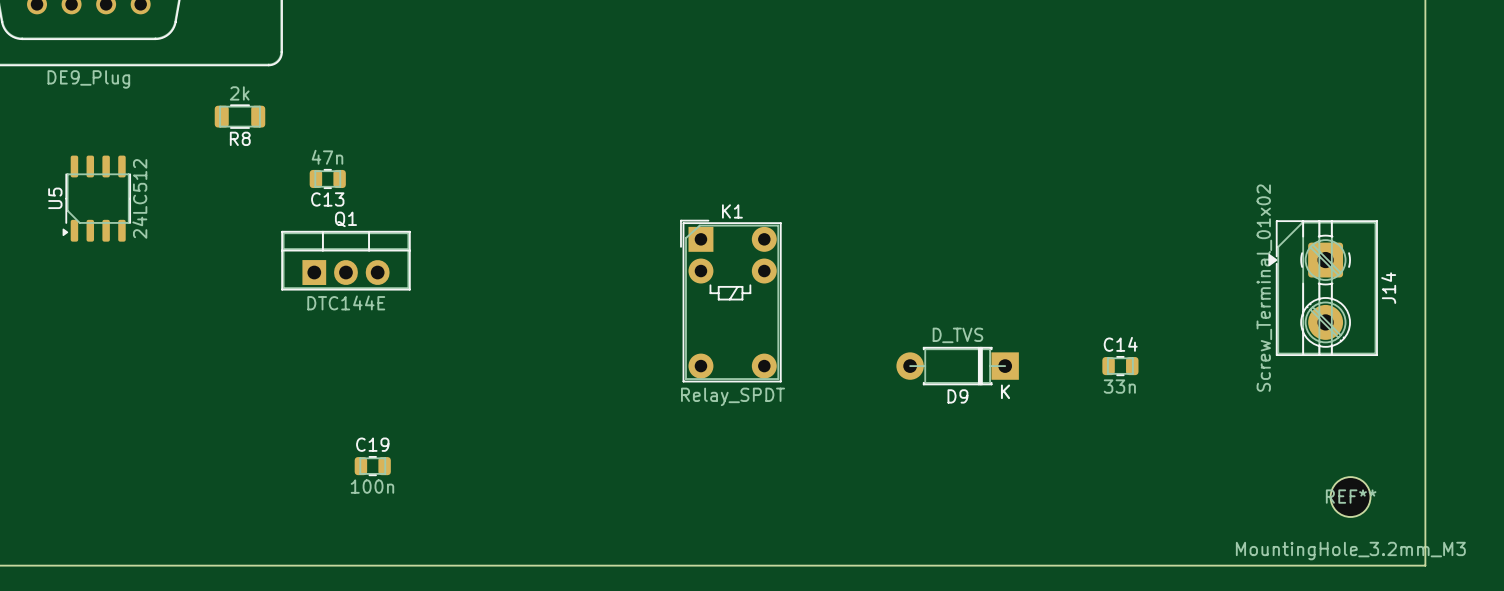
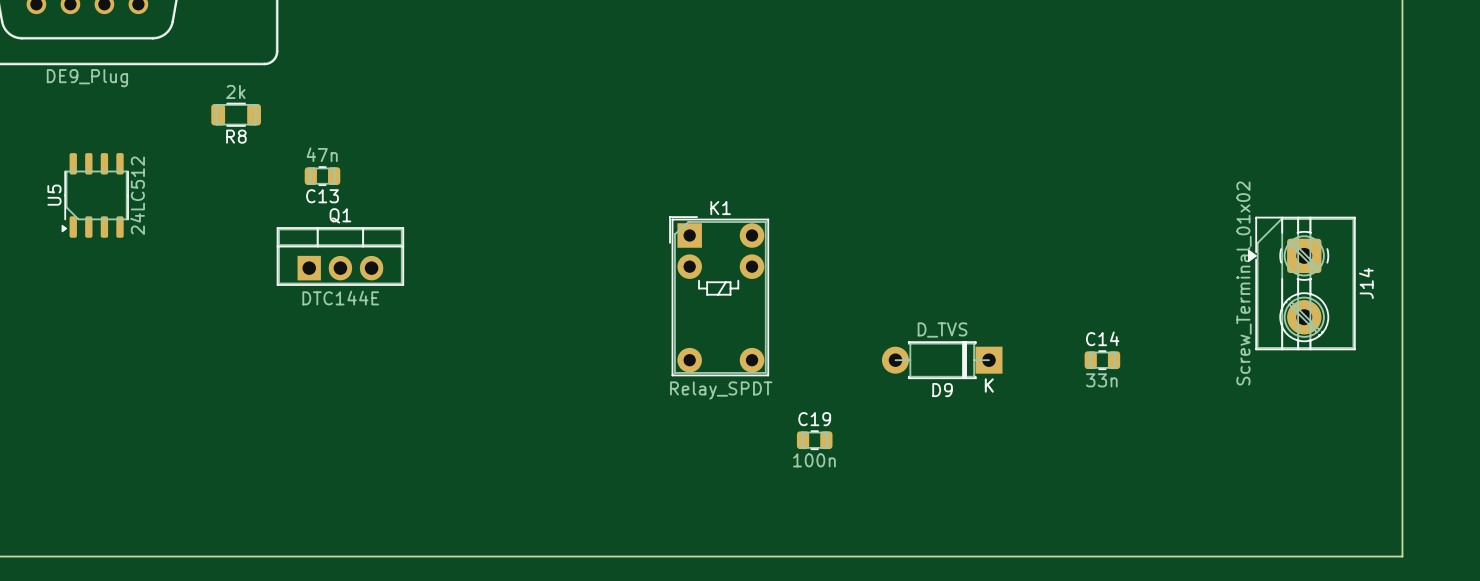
C19 position: (372, 466) -> (814, 440)
REF**: MountingHole_3.2mm_M3 (1350, 497) -> none

